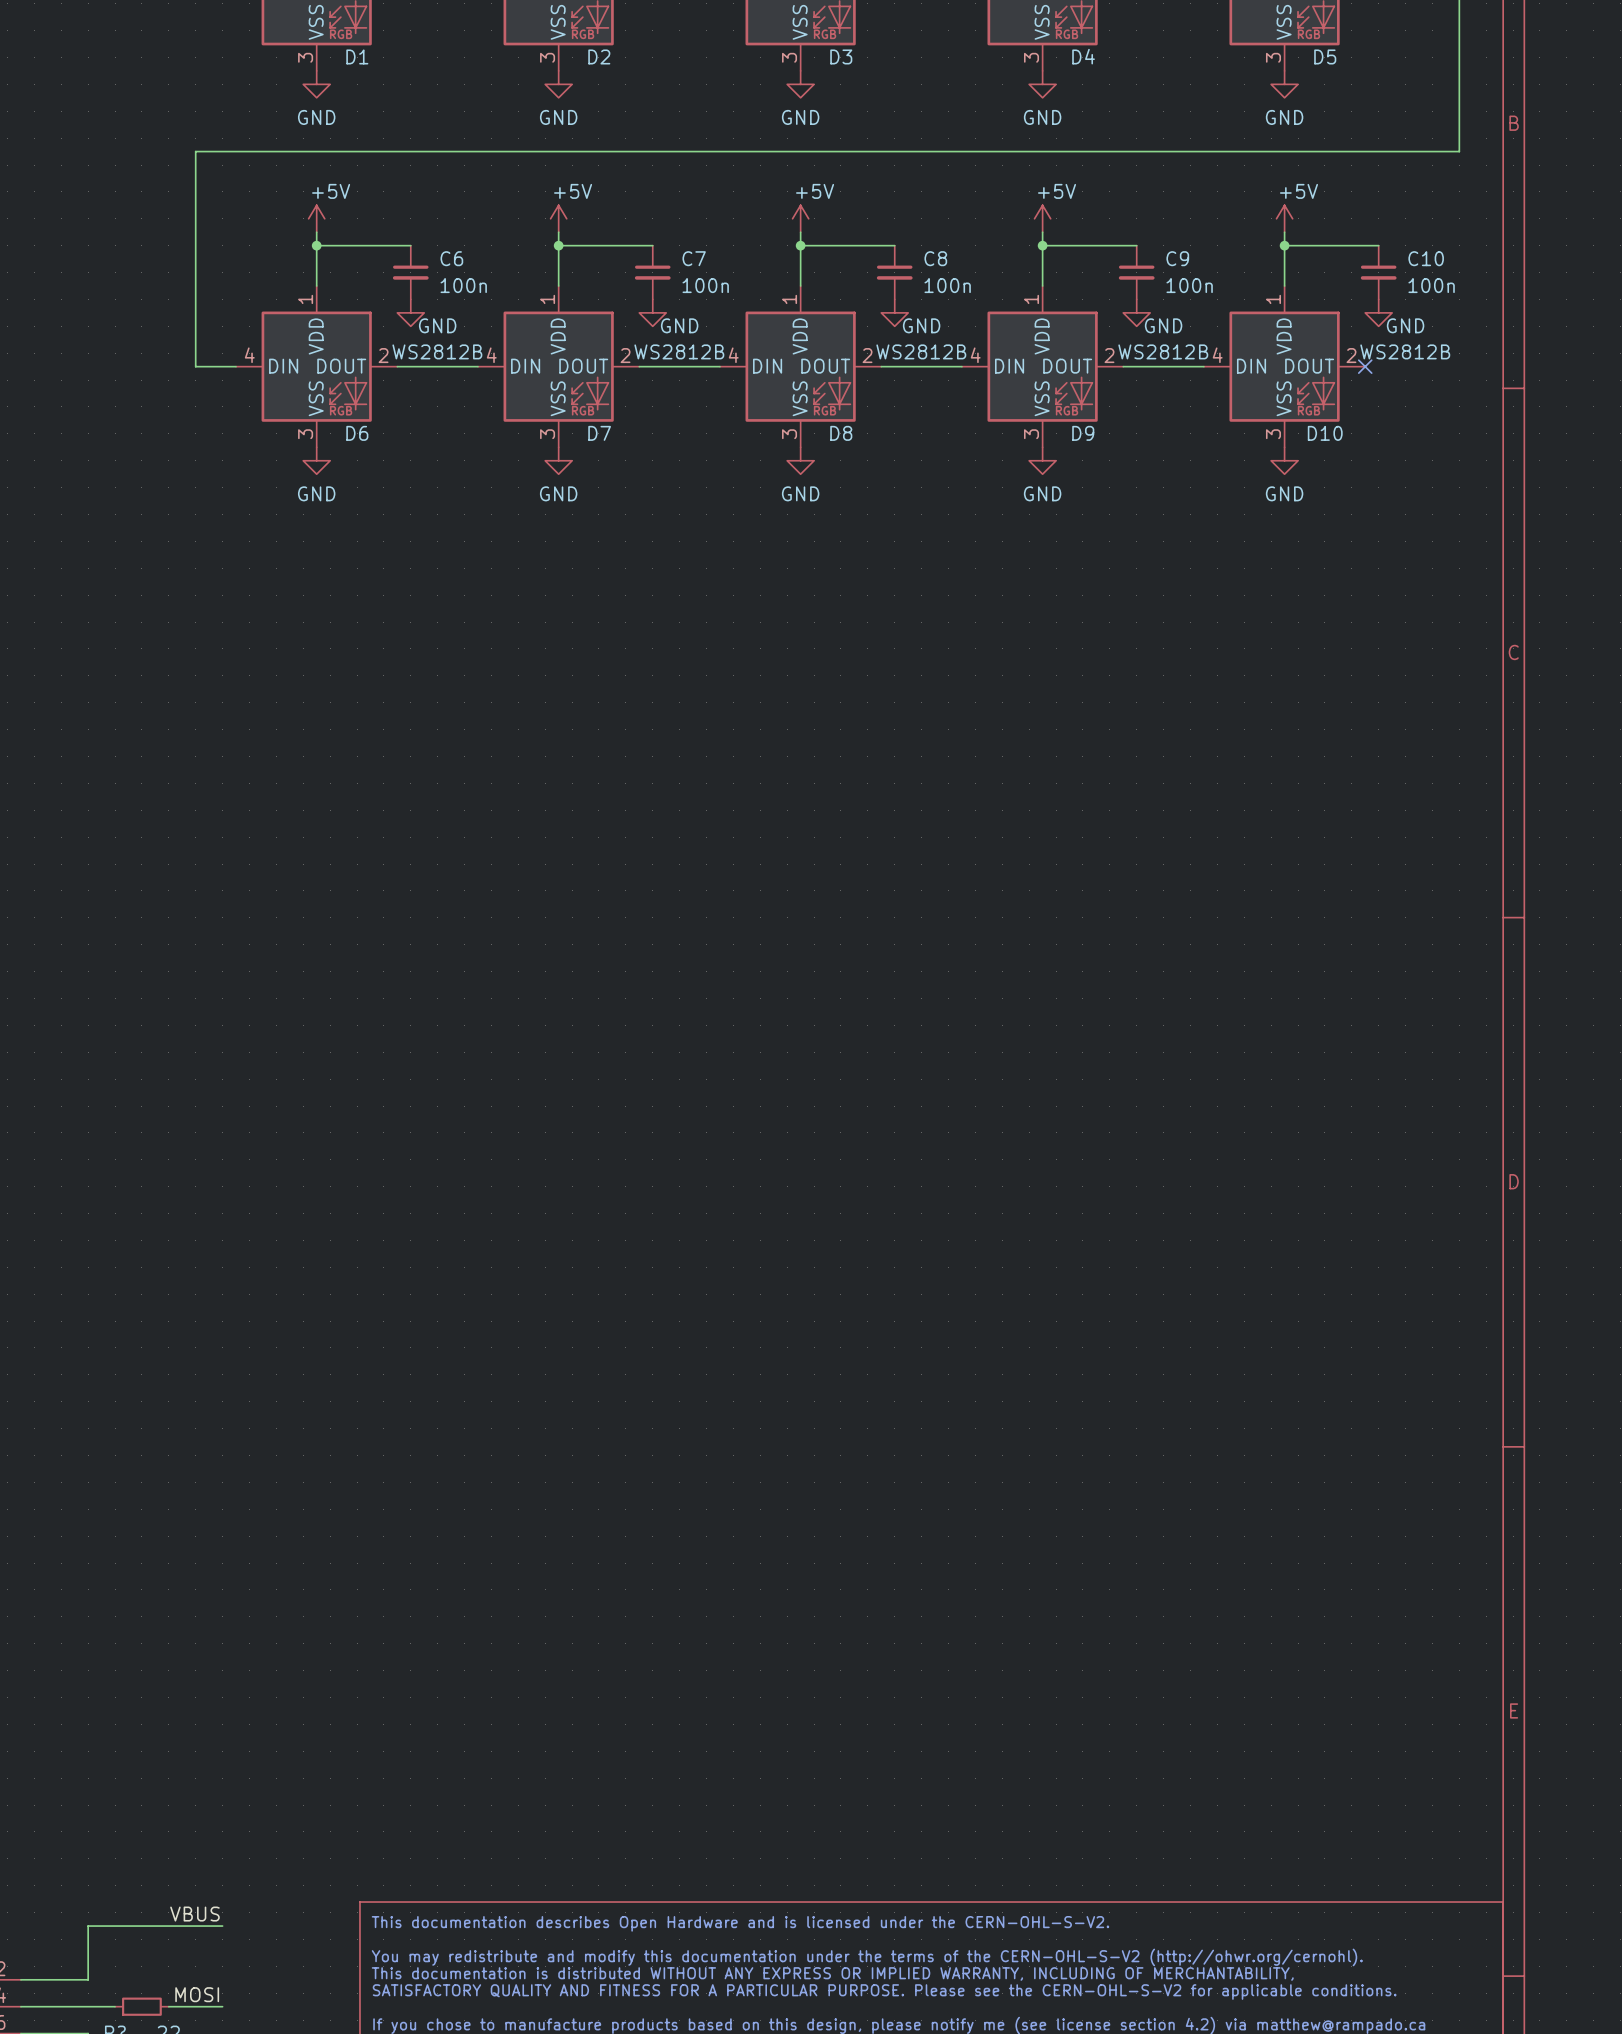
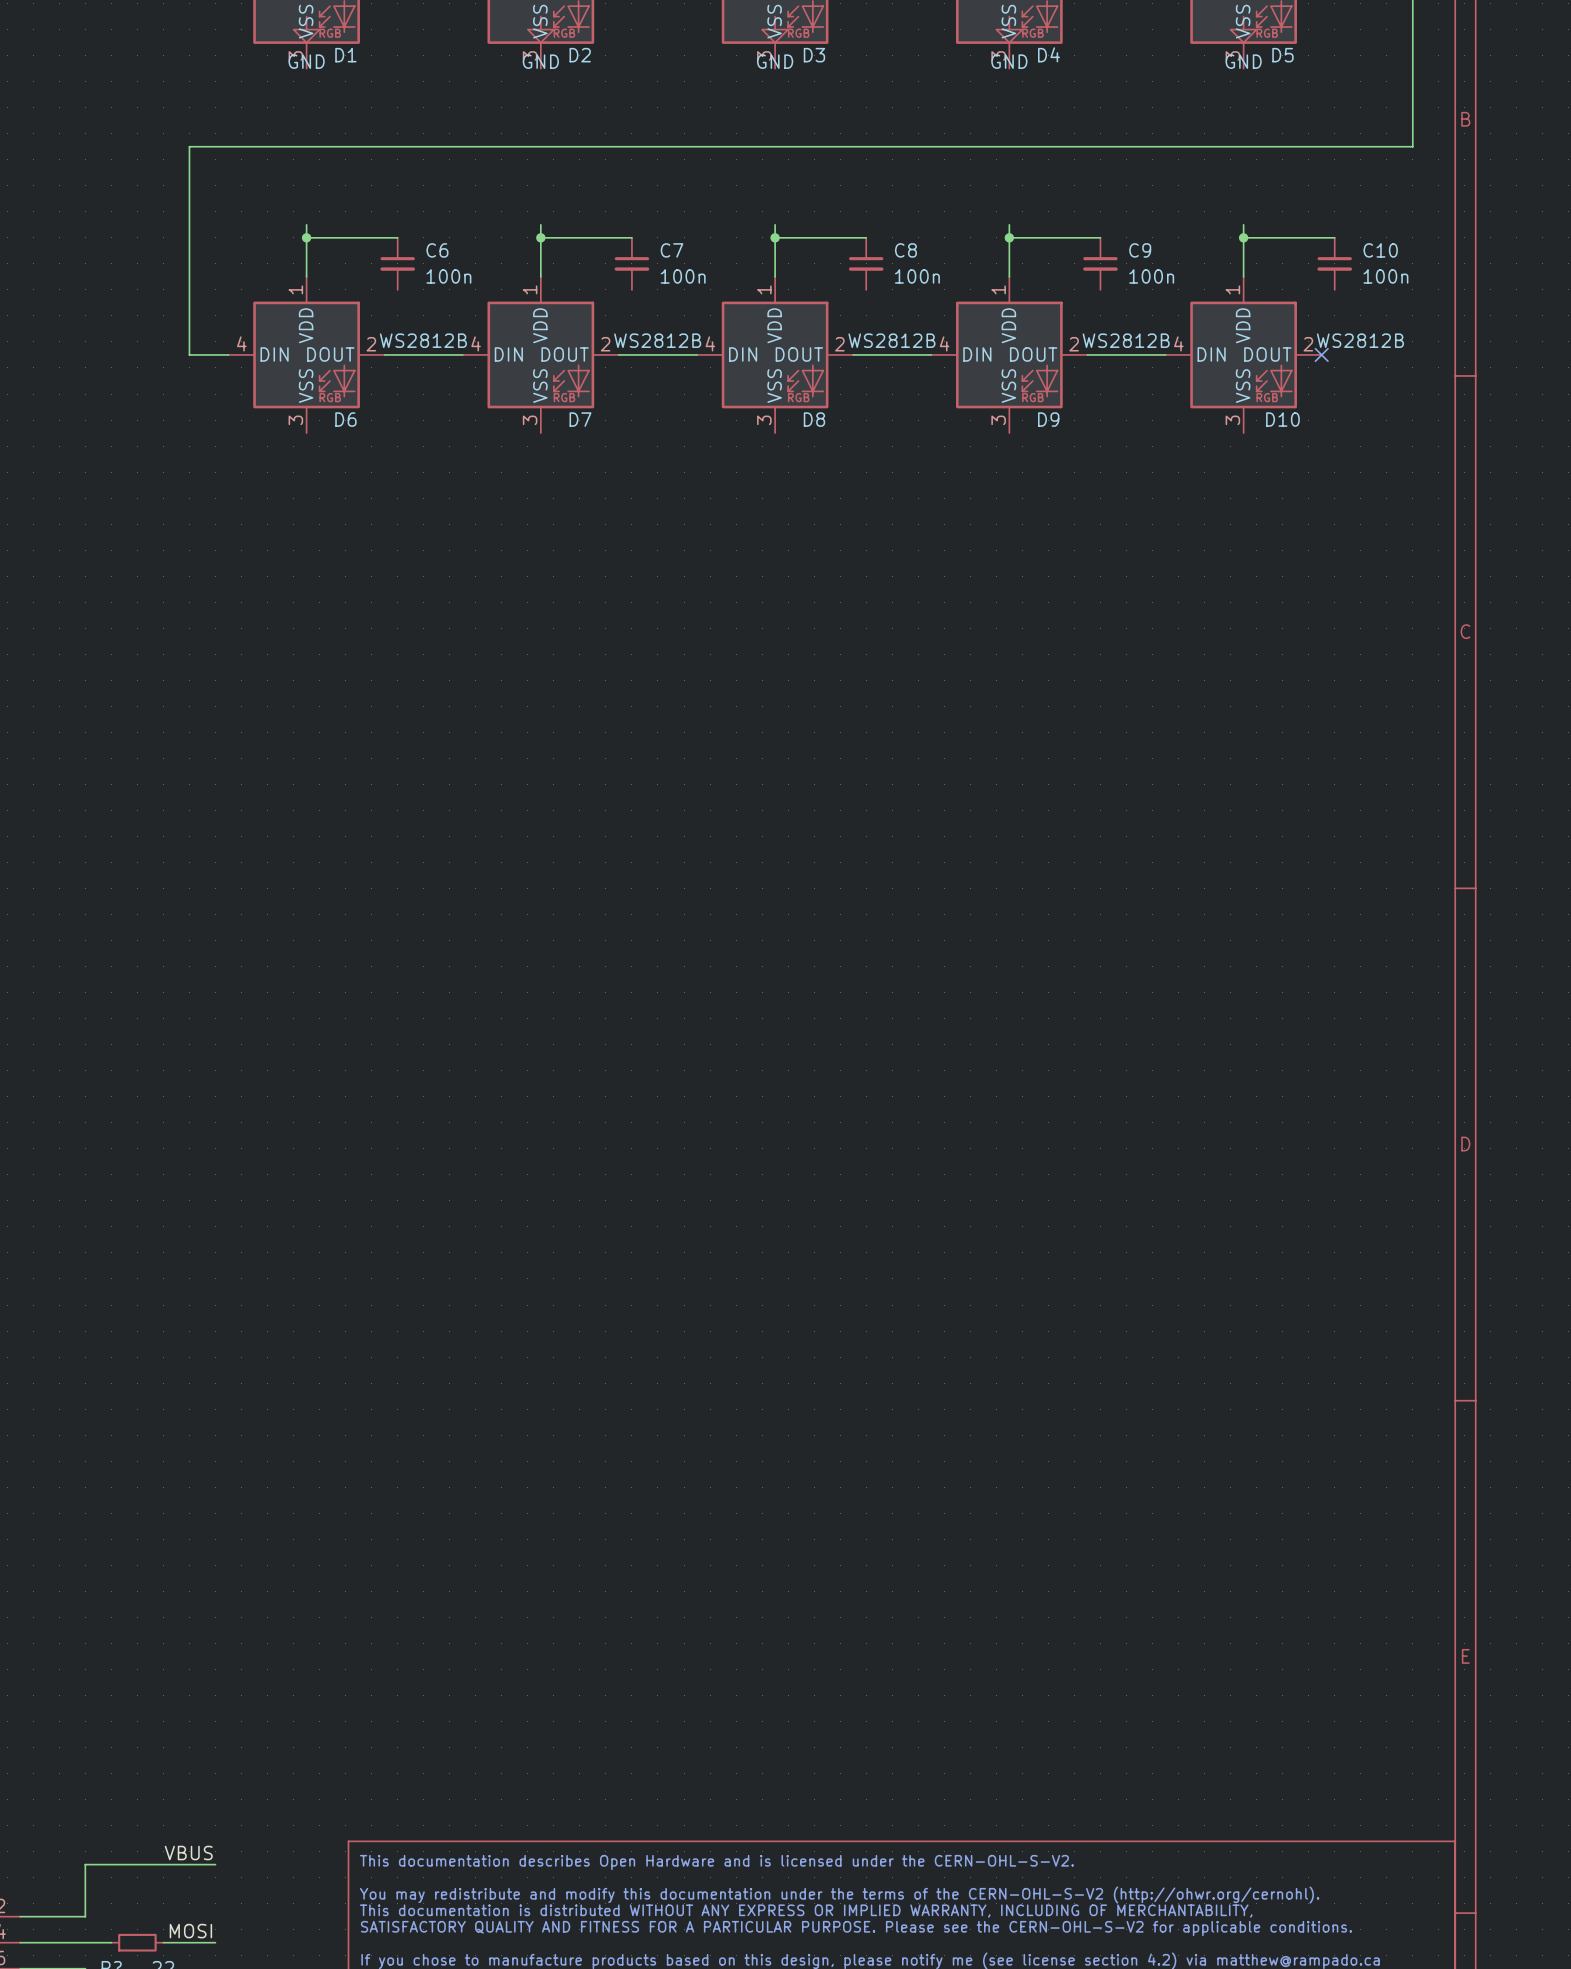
power symbol position: GND (316, 84) -> GND (306, 29)
power symbol position: GND (558, 84) -> GND (540, 29)
power symbol position: GND (800, 84) -> GND (775, 29)
power symbol position: GND (1042, 84) -> GND (1009, 29)
power symbol position: GND (1284, 84) -> GND (1243, 29)
power symbol: +5V (316, 218) -> none
power symbol: +5V (558, 218) -> none
power symbol: +5V (800, 218) -> none
power symbol: +5V (1042, 218) -> none
power symbol: +5V (1284, 218) -> none
power symbol: GND (410, 312) -> none
power symbol: GND (652, 312) -> none
power symbol: GND (894, 312) -> none
power symbol: GND (1136, 312) -> none
power symbol: GND (1378, 312) -> none
power symbol: GND (316, 460) -> none
power symbol: GND (558, 460) -> none
power symbol: GND (800, 460) -> none
power symbol: GND (1042, 460) -> none
power symbol: GND (1284, 460) -> none

